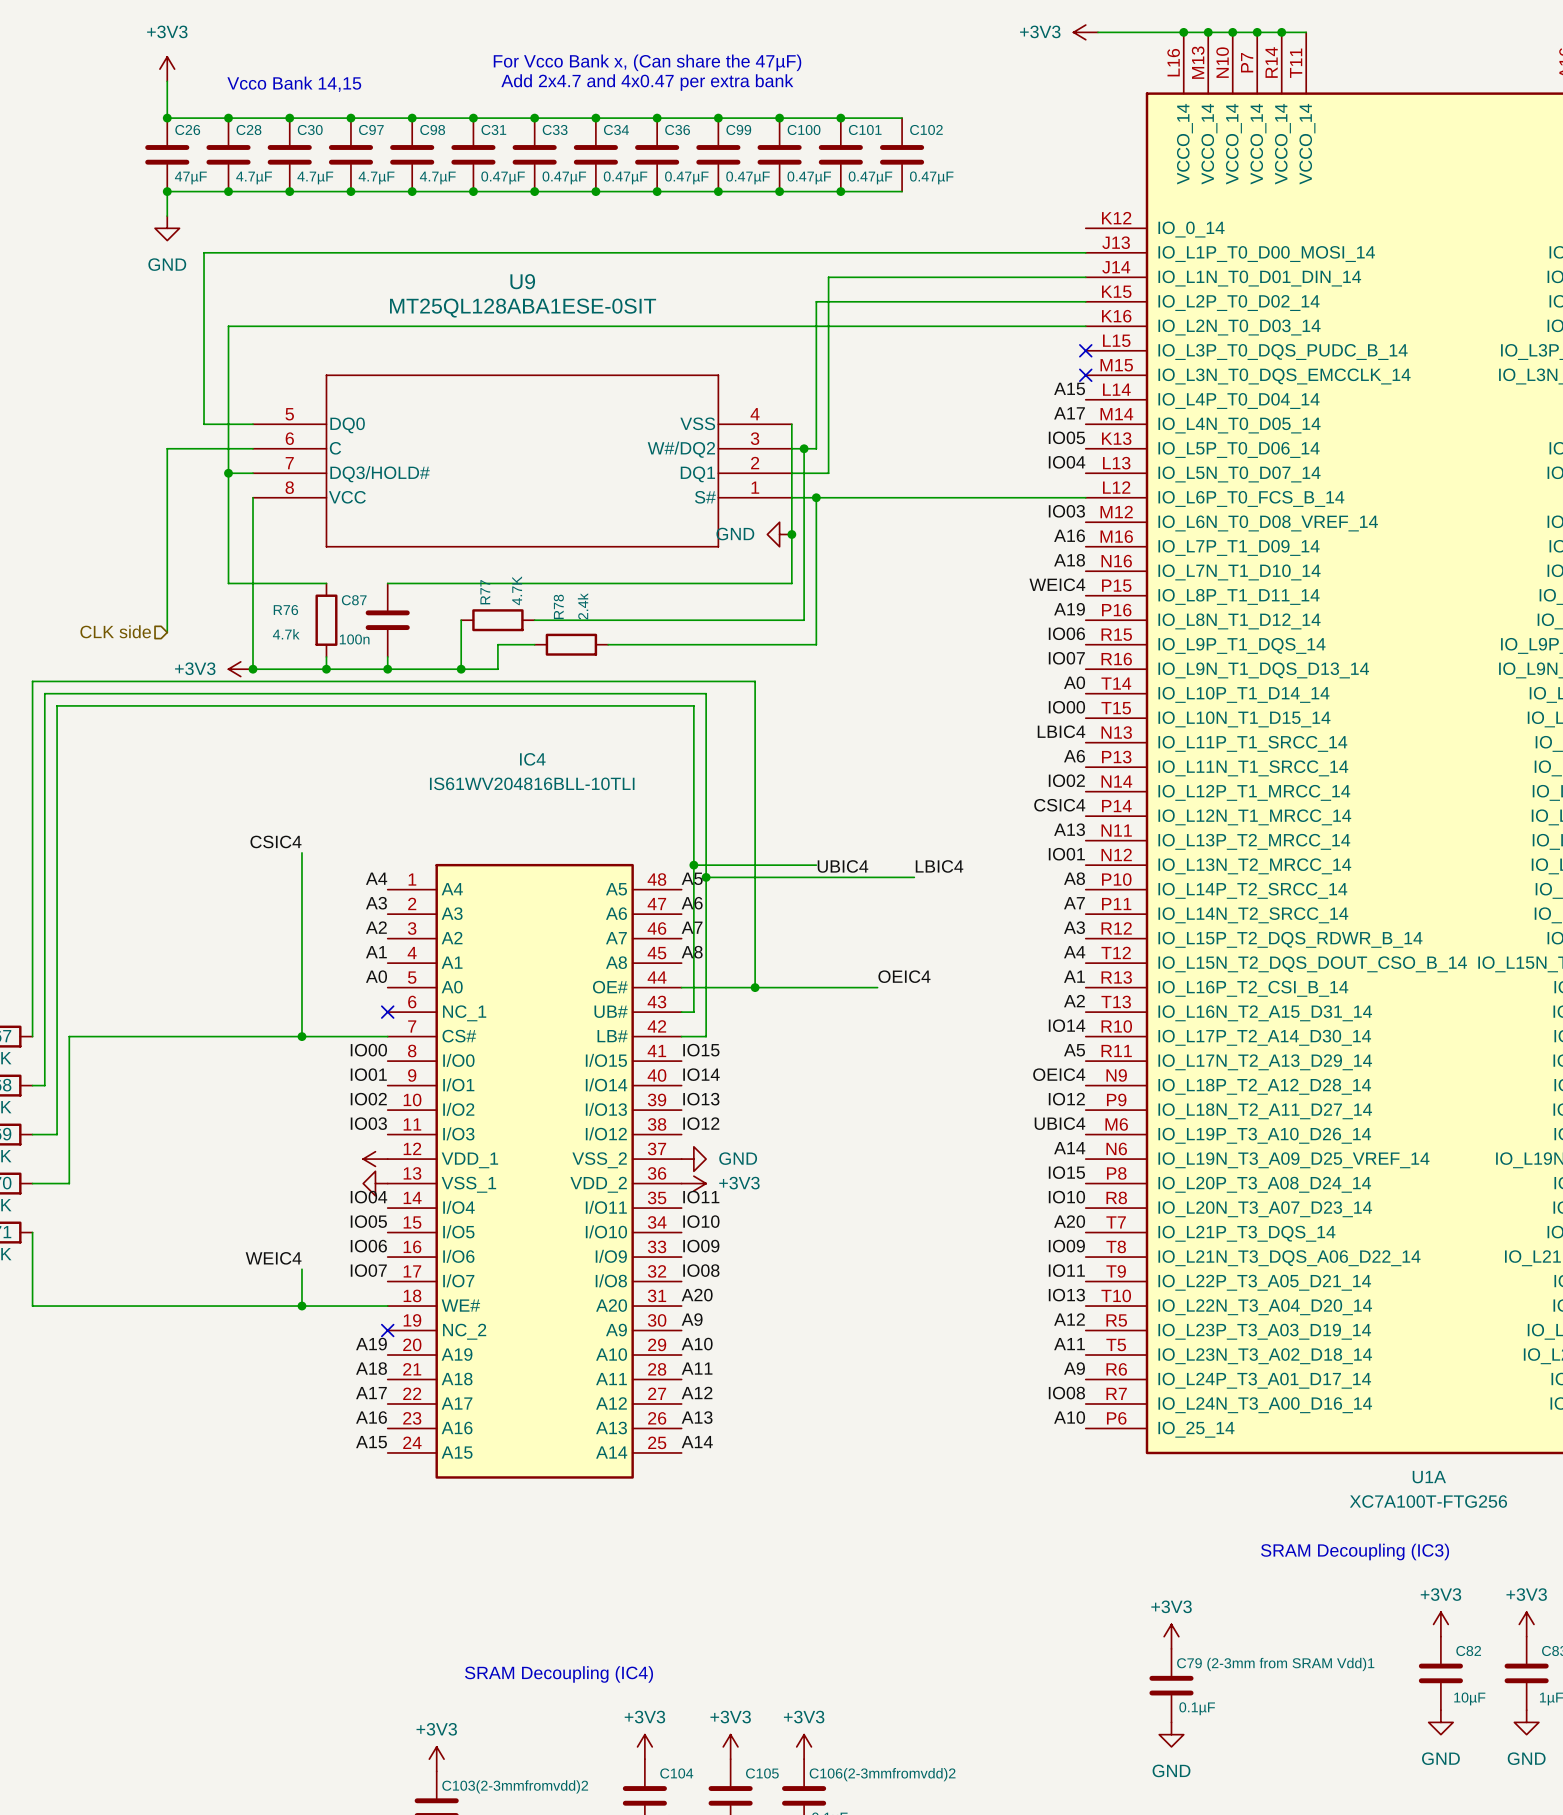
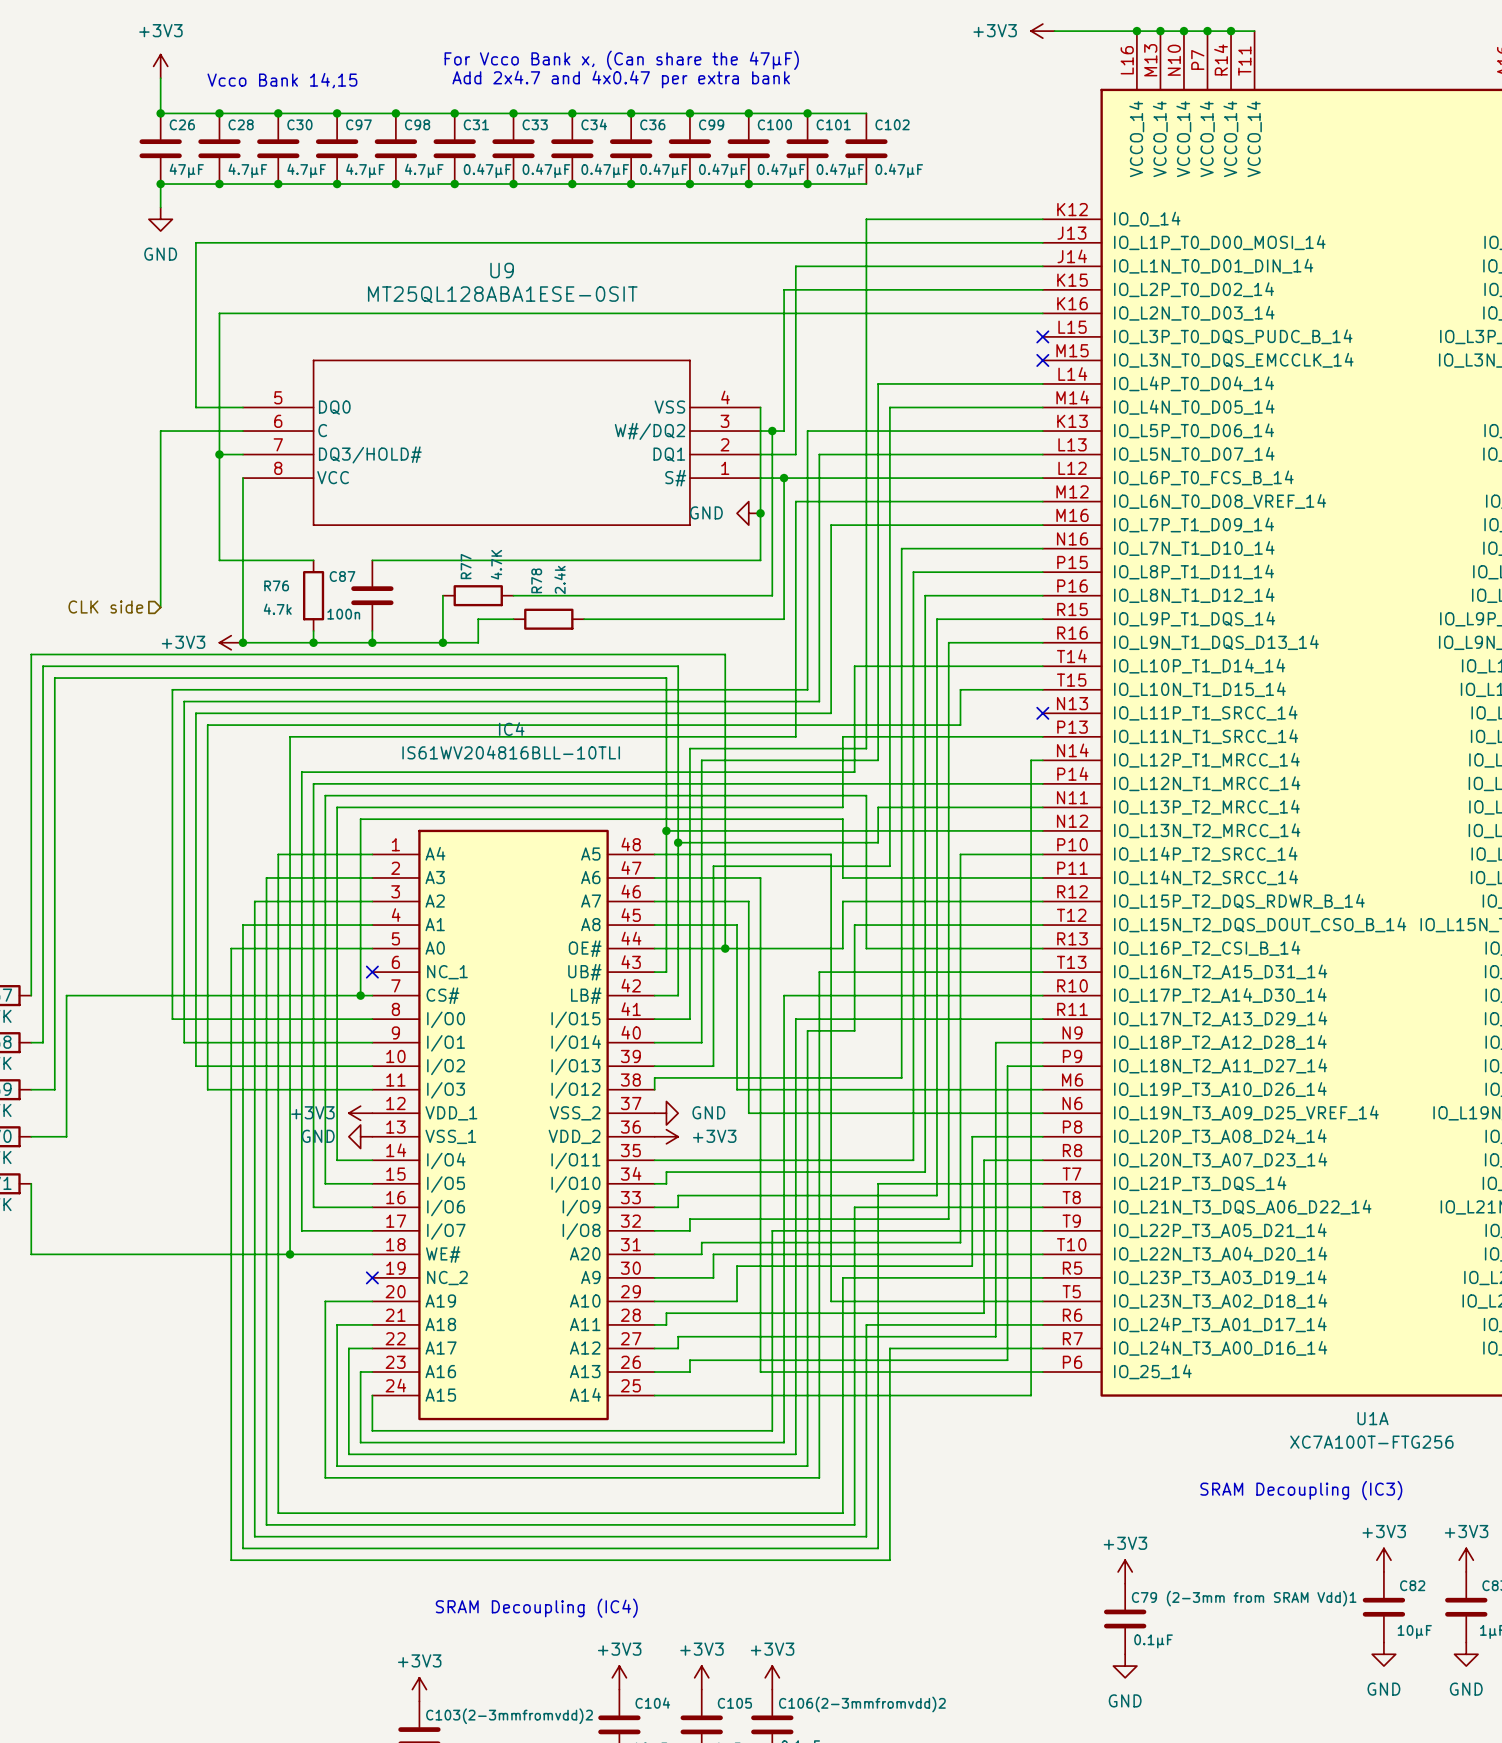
wire: none -> (1042, 219) (866, 219) (866, 748) (689, 748) (689, 1019) (654, 1019)
label: A15 (1069, 388) -> none
wire: none -> (1042, 383) (878, 383) (878, 760) (701, 760) (701, 1042) (654, 1042)
label: A17 (1069, 413) -> none
wire: none -> (1042, 407) (889, 407) (889, 866) (713, 866) (713, 1066) (654, 1066)
label: IO05 (1066, 437) -> none
wire: none -> (1042, 431) (807, 431) (807, 689) (172, 689) (172, 1019) (372, 1019)
label: IO04 (1067, 462) -> none
wire: none -> (1042, 454) (819, 454) (819, 701) (184, 701) (184, 1042) (372, 1042)
label: IO03 (1066, 511) -> none
wire: none -> (1042, 501) (795, 501) (795, 736) (290, 736) (290, 819)
label: A16 (1069, 535) -> none
wire: none -> (1042, 525) (831, 525) (831, 713) (195, 713) (195, 1066) (372, 1066)
label: A18 (1069, 560) -> none
wire: none -> (1042, 548) (901, 548) (901, 1077) (654, 1077) (654, 1089)
label: WEIC4 (1057, 584) -> none
wire: none -> (1042, 572) (913, 572) (913, 1160) (654, 1160)
label: A19 (1069, 609) -> none
wire: none -> (1042, 595) (925, 595) (925, 1172) (666, 1172) (666, 1183) (654, 1183)
label: IO06 (1066, 633) -> none
wire: none -> (1042, 619) (936, 619) (936, 1195) (678, 1195) (678, 1207) (654, 1207)
label: IO07 (1066, 658) -> none
wire: none -> (1042, 642) (948, 642) (948, 1219) (689, 1219) (689, 1230) (654, 1230)
label: A0 (1074, 682) -> none
wire: none -> (1042, 666) (854, 666) (854, 772) (301, 772) (301, 1230) (372, 1230)
label: IO00 (1066, 707) -> none
wire: none -> (1042, 689) (960, 689) (960, 725) (207, 725) (207, 1089) (372, 1089)
label: LBIC4 (1061, 731) -> none
no-connect mark: none -> (1042, 713)
label: A6 (1074, 756) -> none
wire: none -> (1042, 736) (842, 736) (842, 807) (337, 807) (337, 1160) (372, 1160)
label: IO02 (1066, 780) -> none
wire: none -> (1042, 760) (1031, 760) (1031, 1395) (654, 1395)
label: CSIC4 (1059, 805) -> none
wire: none -> (1042, 783) (313, 783) (313, 1207) (372, 1207)
label: A13 (1069, 829) -> none
wire: none -> (1042, 807) (878, 807) (878, 842)
label: CSIC4 (275, 841) -> none
label: IO01 (1066, 854) -> none
wire: none -> (784, 830) (1042, 830)
label: UBIC4 (842, 866) -> none
label: LBIC4 (939, 866) -> none
label: A4 (376, 878) -> none
label: A5 (692, 878) -> none
label: A8 (1074, 878) -> none
wire: none -> (372, 854) (278, 854) (278, 1513) (842, 1513) (842, 1277) (1042, 1277)
wire: none -> (654, 854) (831, 854) (831, 1301) (1042, 1301)
wire: none -> (1042, 854) (960, 854) (960, 1242) (701, 1242) (701, 1254) (654, 1254)
label: A3 (376, 903) -> none
label: A6 (692, 903) -> none
label: A7 (1074, 903) -> none
wire: none -> (372, 877) (266, 877) (266, 1524) (854, 1524) (854, 1207) (1042, 1207)
wire: none -> (654, 877) (760, 877) (760, 1372) (1042, 1372)
wire: none -> (1042, 877) (842, 877) (842, 819) (360, 819) (360, 995)
label: A2 (376, 927) -> none
label: A7 (692, 927) -> none
label: A3 (1074, 927) -> none
wire: none -> (372, 901) (254, 901) (254, 1536) (866, 1536) (866, 1324) (1042, 1324)
wire: none -> (654, 901) (748, 901) (748, 1113) (1042, 1113)
wire: none -> (1042, 901) (842, 901) (842, 948)
label: A1 (376, 952) -> none
label: A8 (692, 952) -> none
label: A4 (1074, 952) -> none
wire: none -> (372, 925) (242, 925) (242, 1548) (878, 1548) (878, 1183) (1042, 1183)
wire: none -> (654, 925) (737, 925) (737, 1089) (1042, 1089)
wire: none -> (1042, 925) (854, 925) (854, 1030) (807, 1030) (807, 1466) (337, 1466) (337, 1324) (372, 1324)
label: A0 (376, 976) -> none
label: OEIC4 (904, 976) -> none
label: A1 (1074, 976) -> none
wire: none -> (372, 948) (231, 948) (231, 1560) (889, 1560) (889, 1348) (1042, 1348)
wire: none -> (1042, 948) (866, 948) (866, 795) (325, 795) (325, 1183) (372, 1183)
label: A2 (1074, 1001) -> none
wire: none -> (1042, 972) (819, 972) (819, 1477) (325, 1477) (325, 1301) (372, 1301)
label: IO14 (1067, 1025) -> none
wire: none -> (290, 995) (290, 1219)
junction: (301, 1036) -> none
junction: none -> (360, 995)
wire: none -> (1042, 995) (784, 995) (784, 1442) (360, 1442) (360, 1372) (372, 1372)
label: IO00 (368, 1050) -> none
label: IO15 (701, 1050) -> none
label: A5 (1074, 1050) -> none
wire: none -> (1042, 1019) (795, 1019) (795, 1454) (348, 1454) (348, 1348) (372, 1348)
label: IO01 (368, 1074) -> none
label: IO14 (701, 1074) -> none
label: OEIC4 (1059, 1074) -> none
wire: none -> (1042, 1042) (995, 1042) (995, 1336) (678, 1336) (678, 1348) (654, 1348)
label: IO02 (368, 1099) -> none
label: IO13 (701, 1099) -> none
label: IO12 (1066, 1099) -> none
wire: none -> (1042, 1066) (1007, 1066) (1007, 1360) (689, 1360) (689, 1372) (654, 1372)
label: IO03 (368, 1123) -> none
label: IO12 (701, 1123) -> none
label: UBIC4 (1059, 1123) -> none
label: A14 (1069, 1148) -> none
power symbol text: none -> +3V3 (312, 1112)
label: IO15 (1066, 1172) -> none
power symbol text: none -> GND (318, 1136)
wire: none -> (1042, 1136) (972, 1136) (972, 1266) (737, 1266) (737, 1301) (654, 1301)
label: IO04 (368, 1197) -> none
label: IO11 (701, 1197) -> none
label: IO10 (1066, 1197) -> none
wire: none -> (1042, 1160) (984, 1160) (984, 1313) (666, 1313) (666, 1324) (654, 1324)
label: IO05 (368, 1221) -> none
label: IO10 (701, 1221) -> none
label: A20 (1069, 1221) -> none
label: IO06 (368, 1246) -> none
label: IO09 (701, 1246) -> none
label: IO09 (1066, 1246) -> none
label: WEIC4 (273, 1258) -> none
label: IO07 (368, 1270) -> none
label: IO08 (701, 1270) -> none
label: IO11 (1066, 1270) -> none
wire: none -> (1042, 1230) (772, 1230) (772, 1430) (372, 1430) (372, 1395)
label: A20 (697, 1295) -> none
label: IO13 (1066, 1295) -> none
wire: none -> (1042, 1254) (713, 1254) (713, 1277) (654, 1277)
label: A9 (692, 1319) -> none
label: A12 (1069, 1319) -> none
label: A19 (371, 1344) -> none
label: A10 (697, 1344) -> none
label: A11 (1069, 1344) -> none
label: A18 (371, 1368) -> none
label: A11 (697, 1368) -> none
label: A9 (1074, 1368) -> none
label: A12 (697, 1392) -> none
label: A17 (371, 1393) -> none
label: IO08 (1066, 1393) -> none
label: A16 (371, 1417) -> none
label: A13 (697, 1417) -> none
label: A10 (1069, 1417) -> none
label: A15 (371, 1442) -> none
label: A14 (697, 1442) -> none

